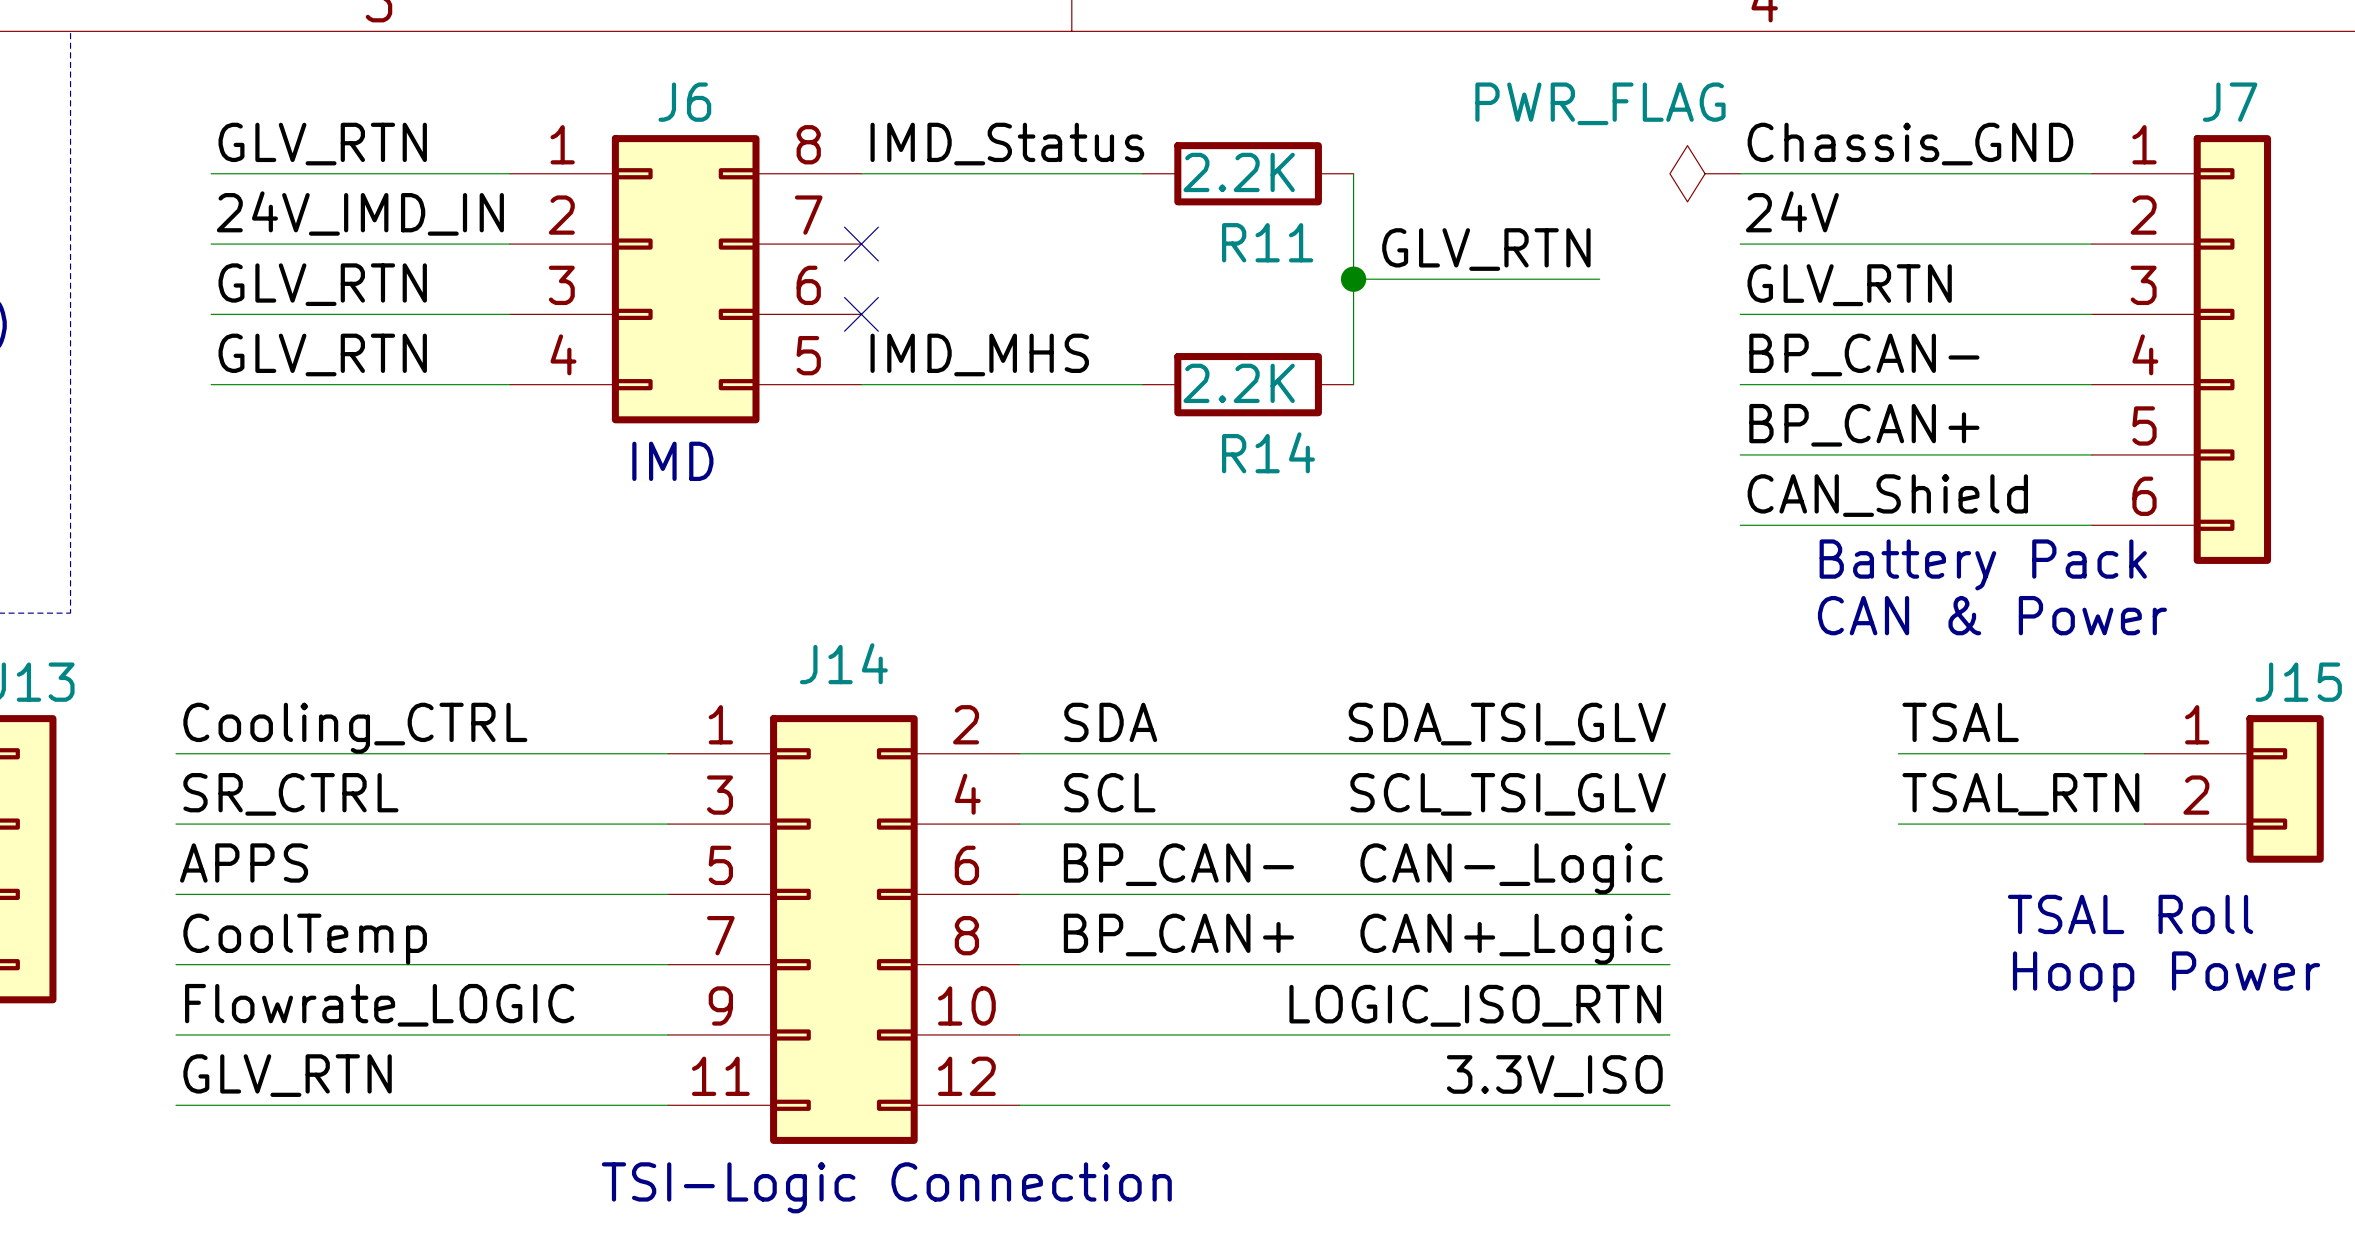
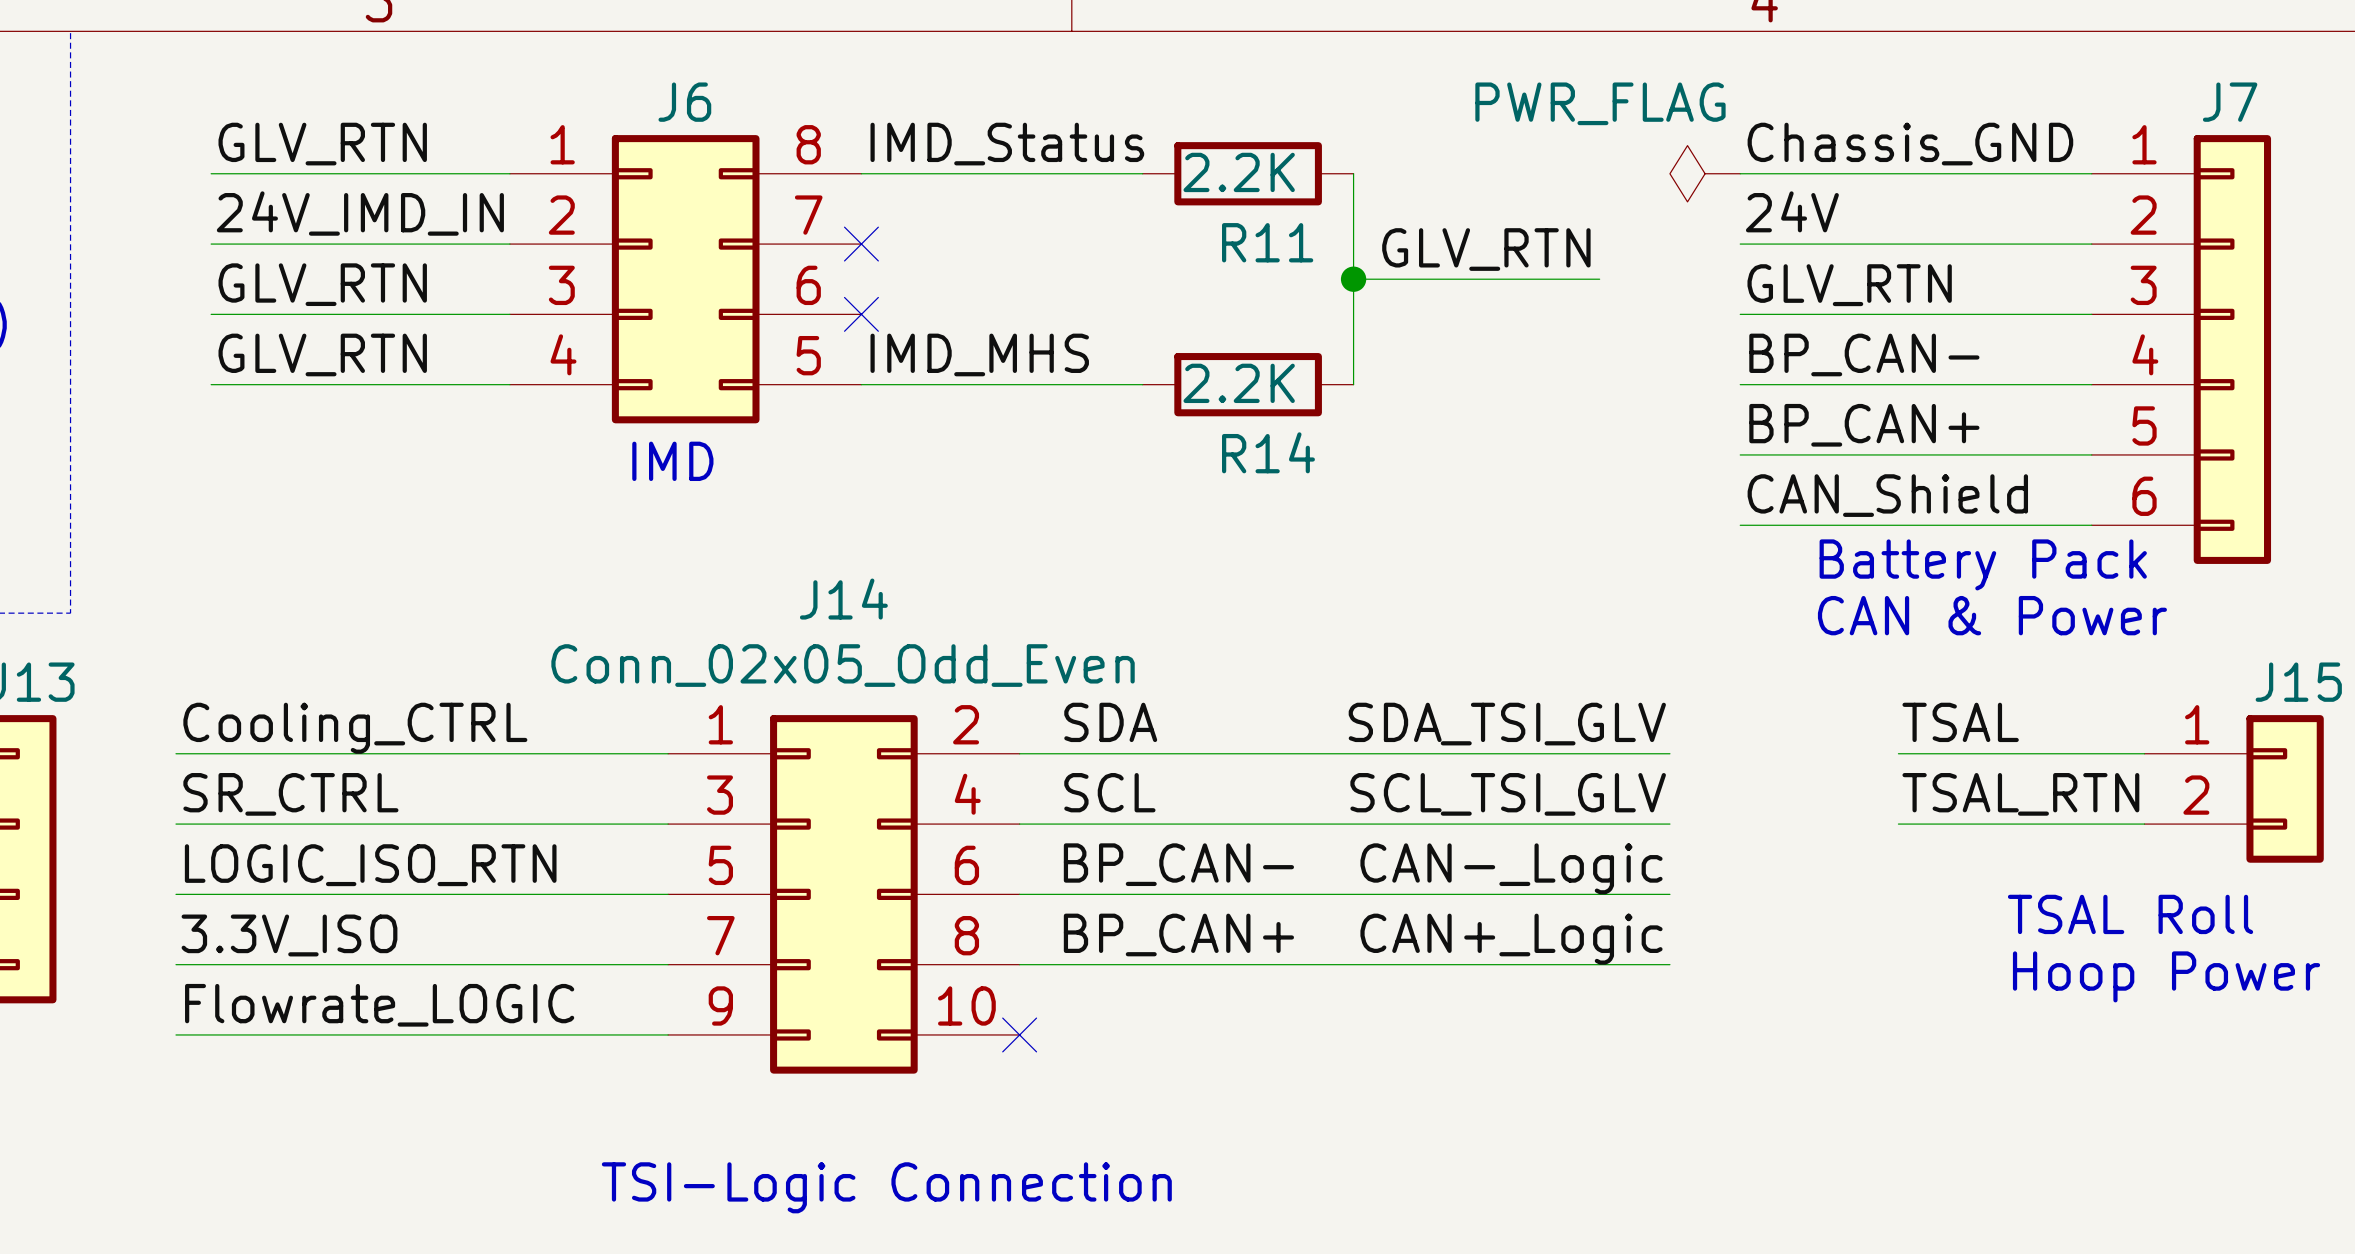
J14 value: none -> Conn_02x05_Odd_Even (843, 665)
J14 symbol: [668, 715, 1020, 1144] -> [668, 715, 1020, 1074]
label: APPS (244, 863) -> LOGIC_ISO_RTN (370, 865)
label: CoolTemp (305, 939) -> 3.3V_ISO (289, 935)
label: LOGIC_ISO_RTN (1475, 1005) -> none
wire: (1019, 1034) (1669, 1034) -> none
no-connect mark: none -> (1019, 1034)
label: GLV_RTN (287, 1075) -> none
label: 3.3V_ISO (1554, 1076) -> none
wire: (175, 1105) (668, 1105) -> none
wire: (1019, 1105) (1669, 1105) -> none

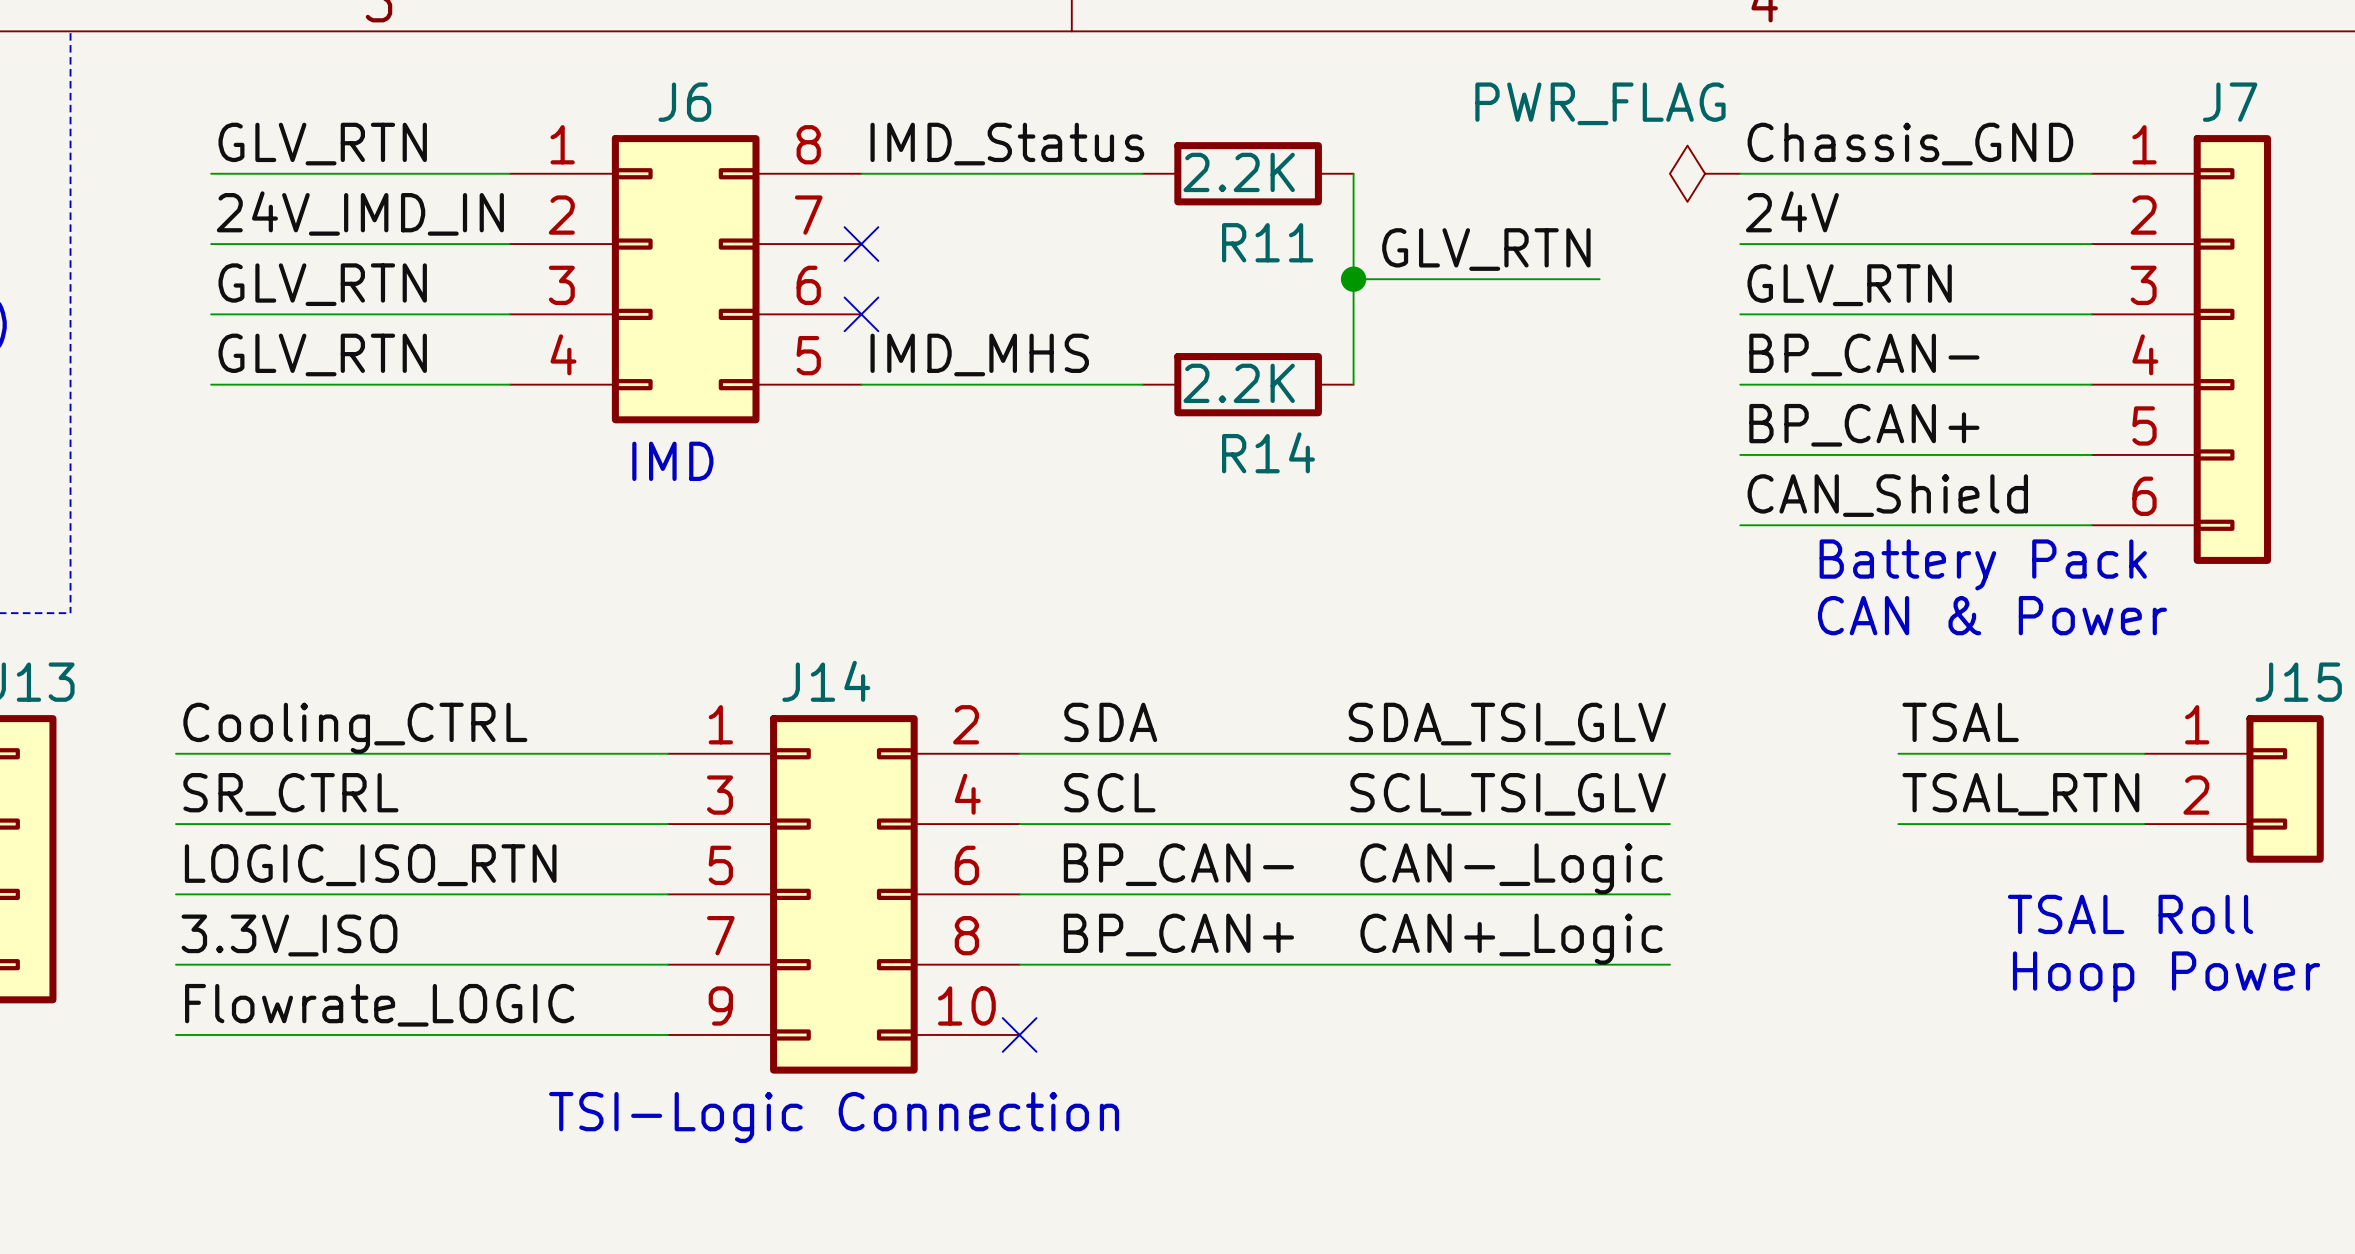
J14 name position: J14 (843, 599) -> J14 (826, 681)
J14 value: Conn_02x05_Odd_Even (843, 665) -> none
text position: TSI-Logic Connection (886, 1187) -> TSI-Logic Connection (834, 1117)

